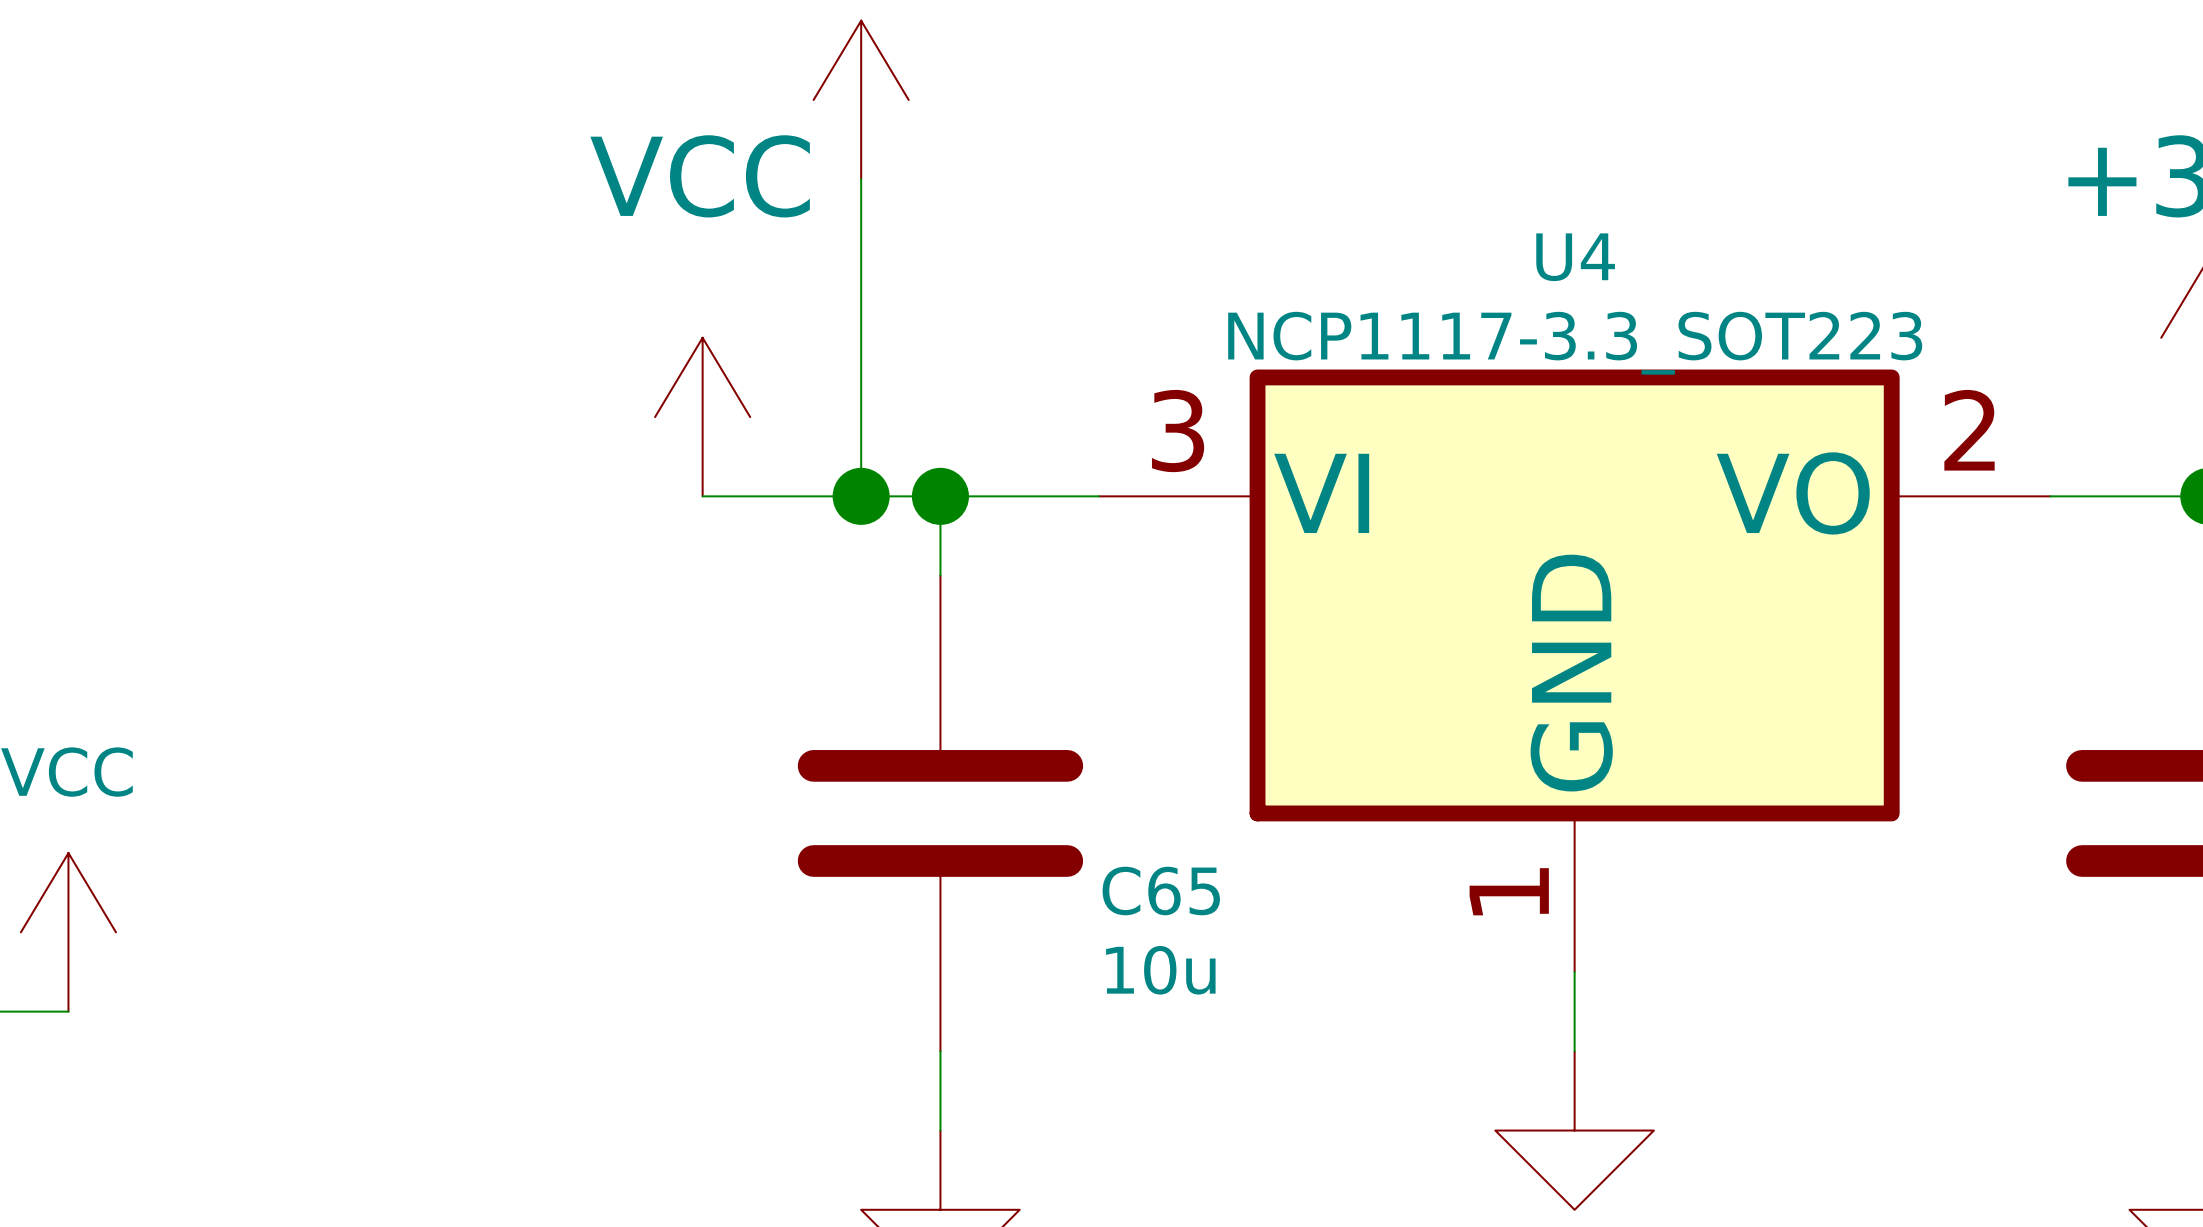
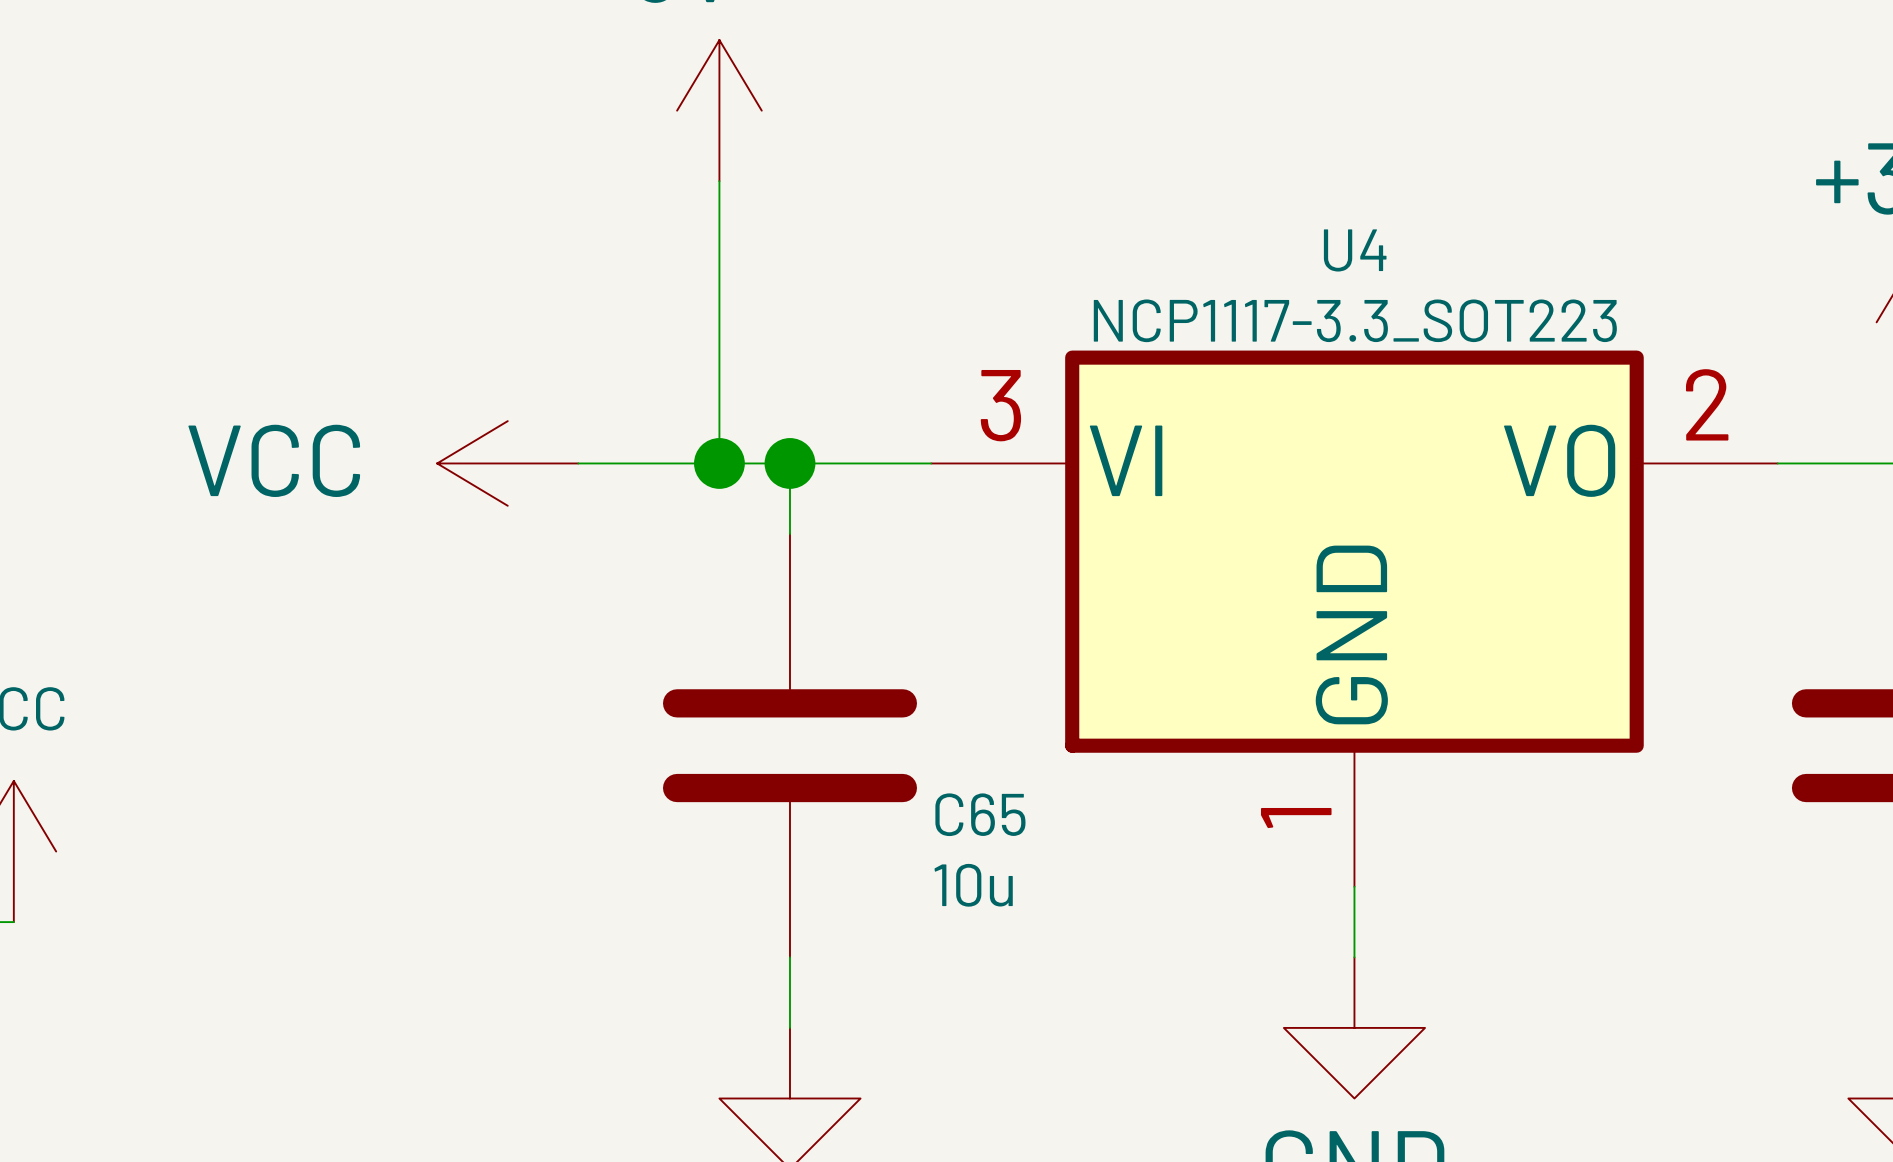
power symbol rotation: 0° (702, 417) -> 90° counterclockwise (507, 463)
power symbol position: VCC (702, 417) -> VCC (507, 463)

